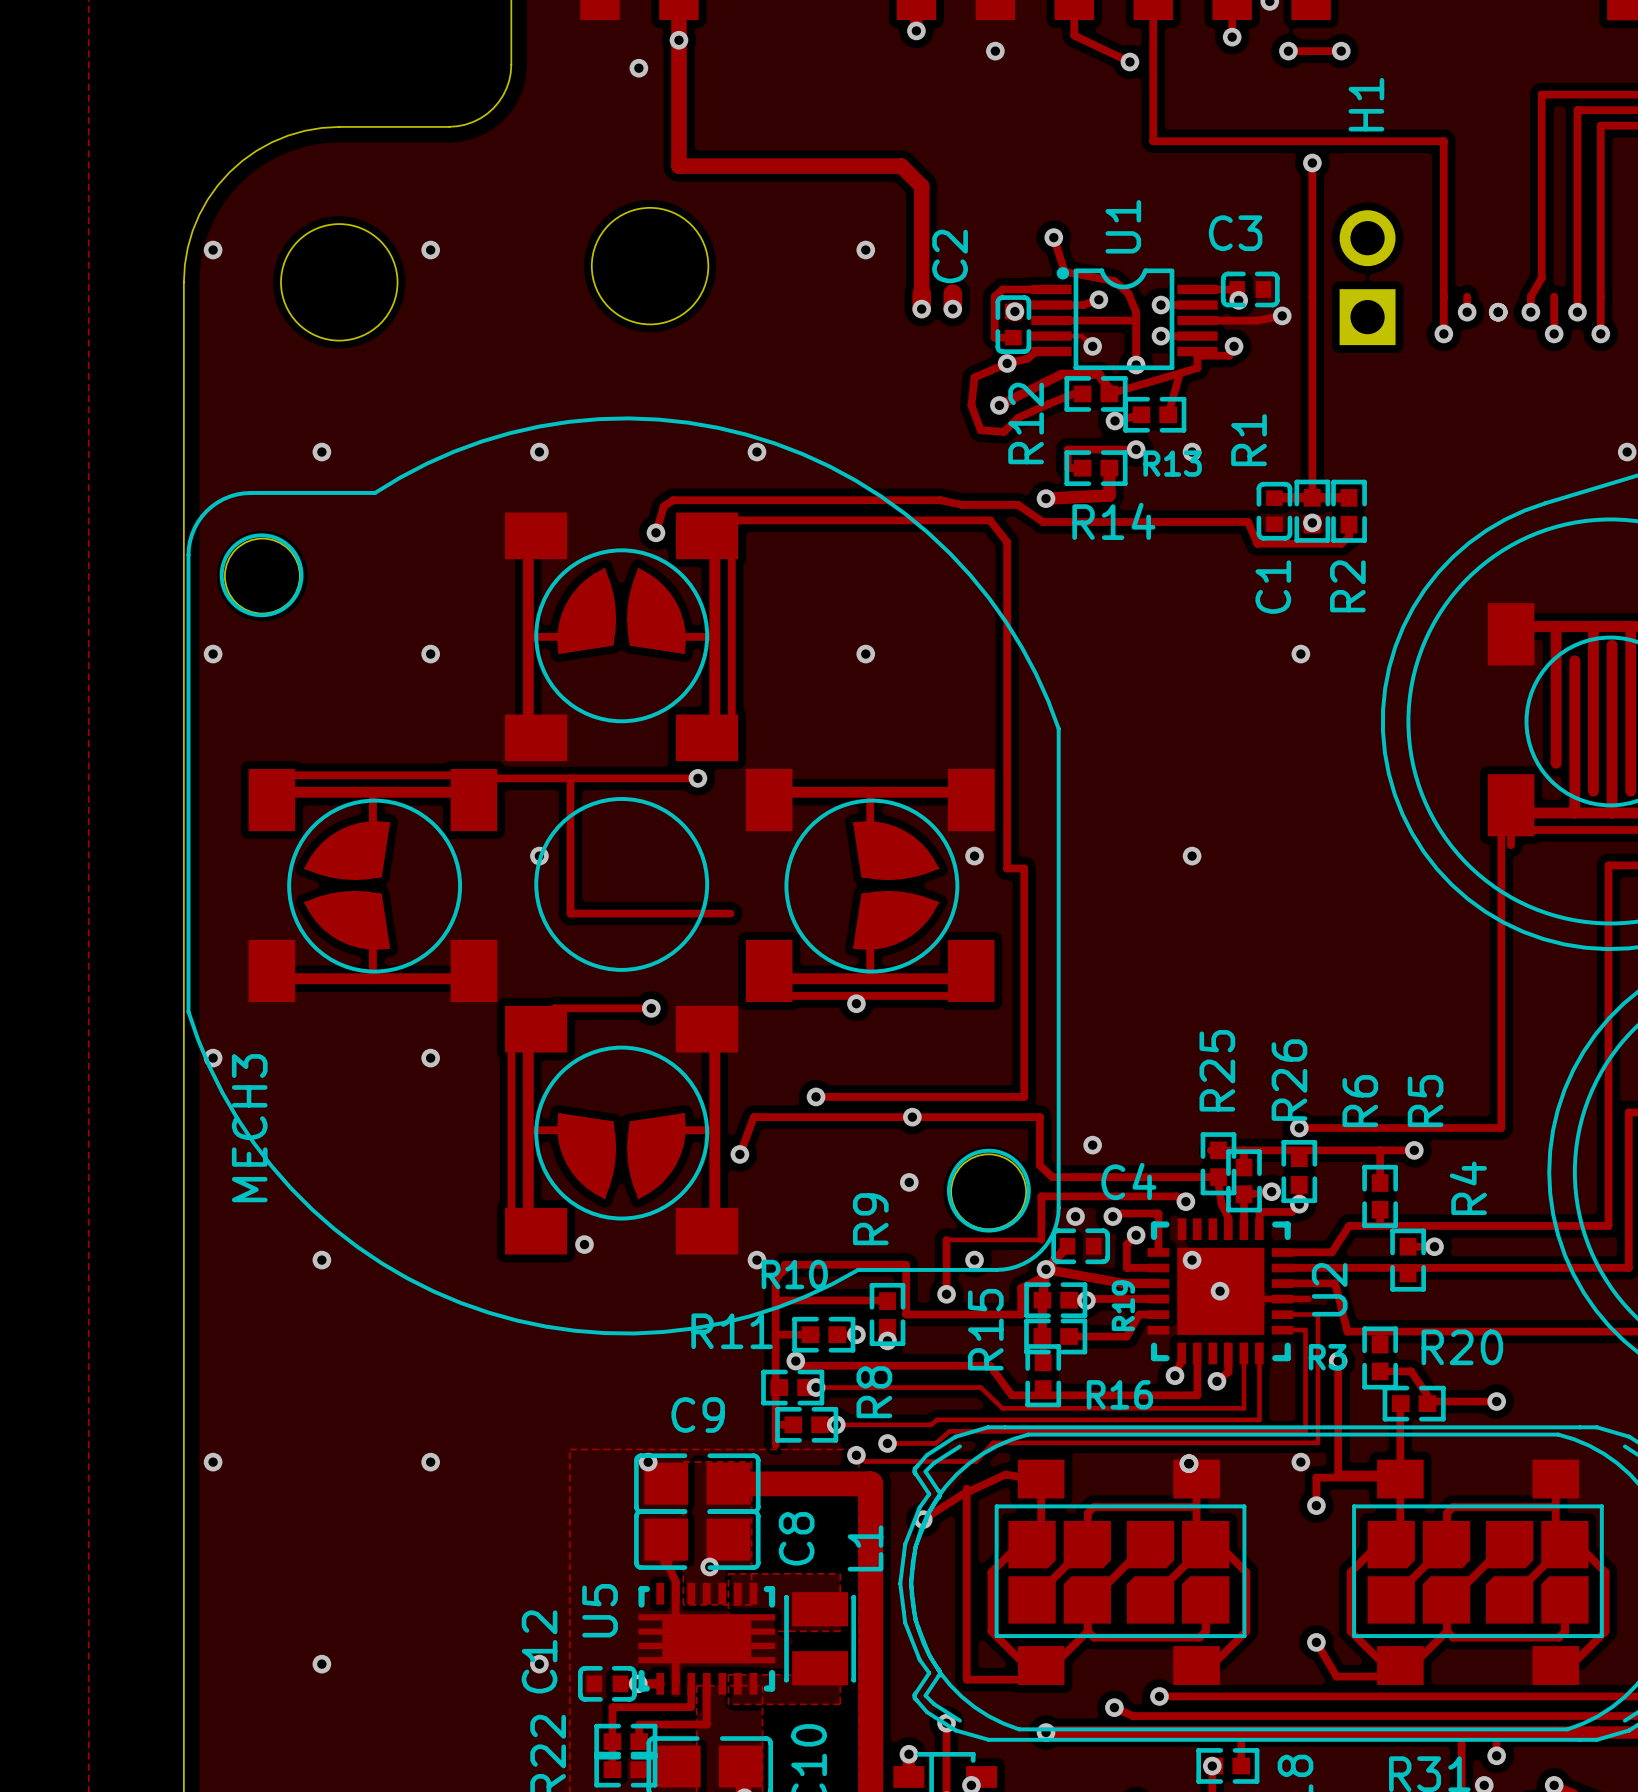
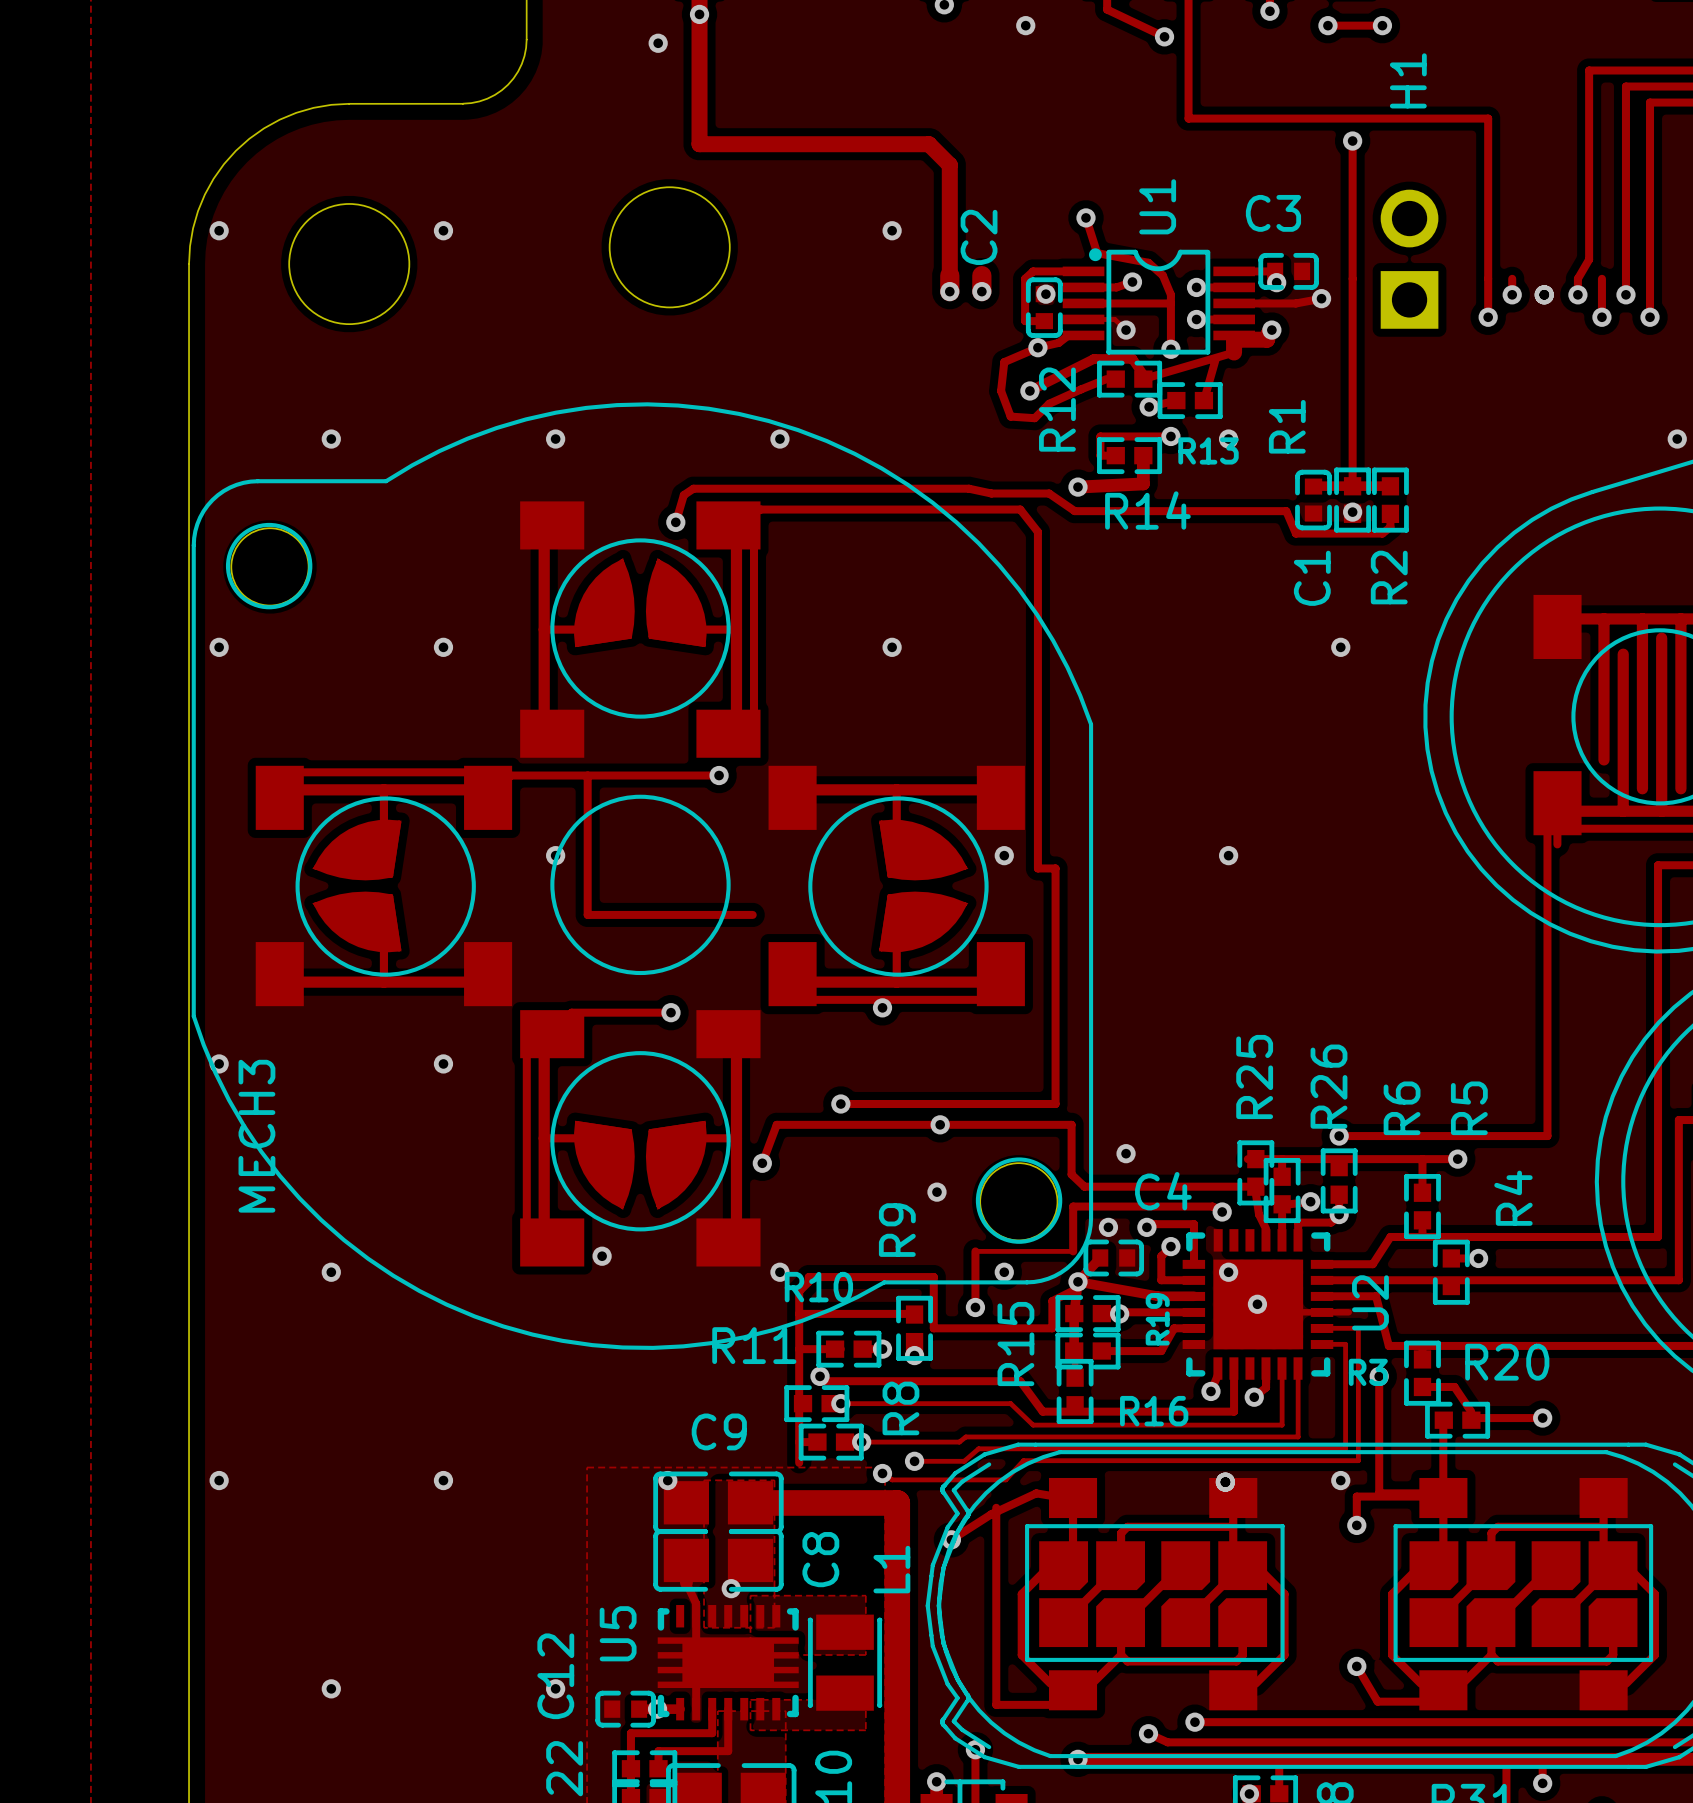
track width: thin (1234, 346) (1229, 355) (1197, 355) (1197, 368) -> thick (1271, 330) (1267, 339) (1234, 339) (1234, 352)

